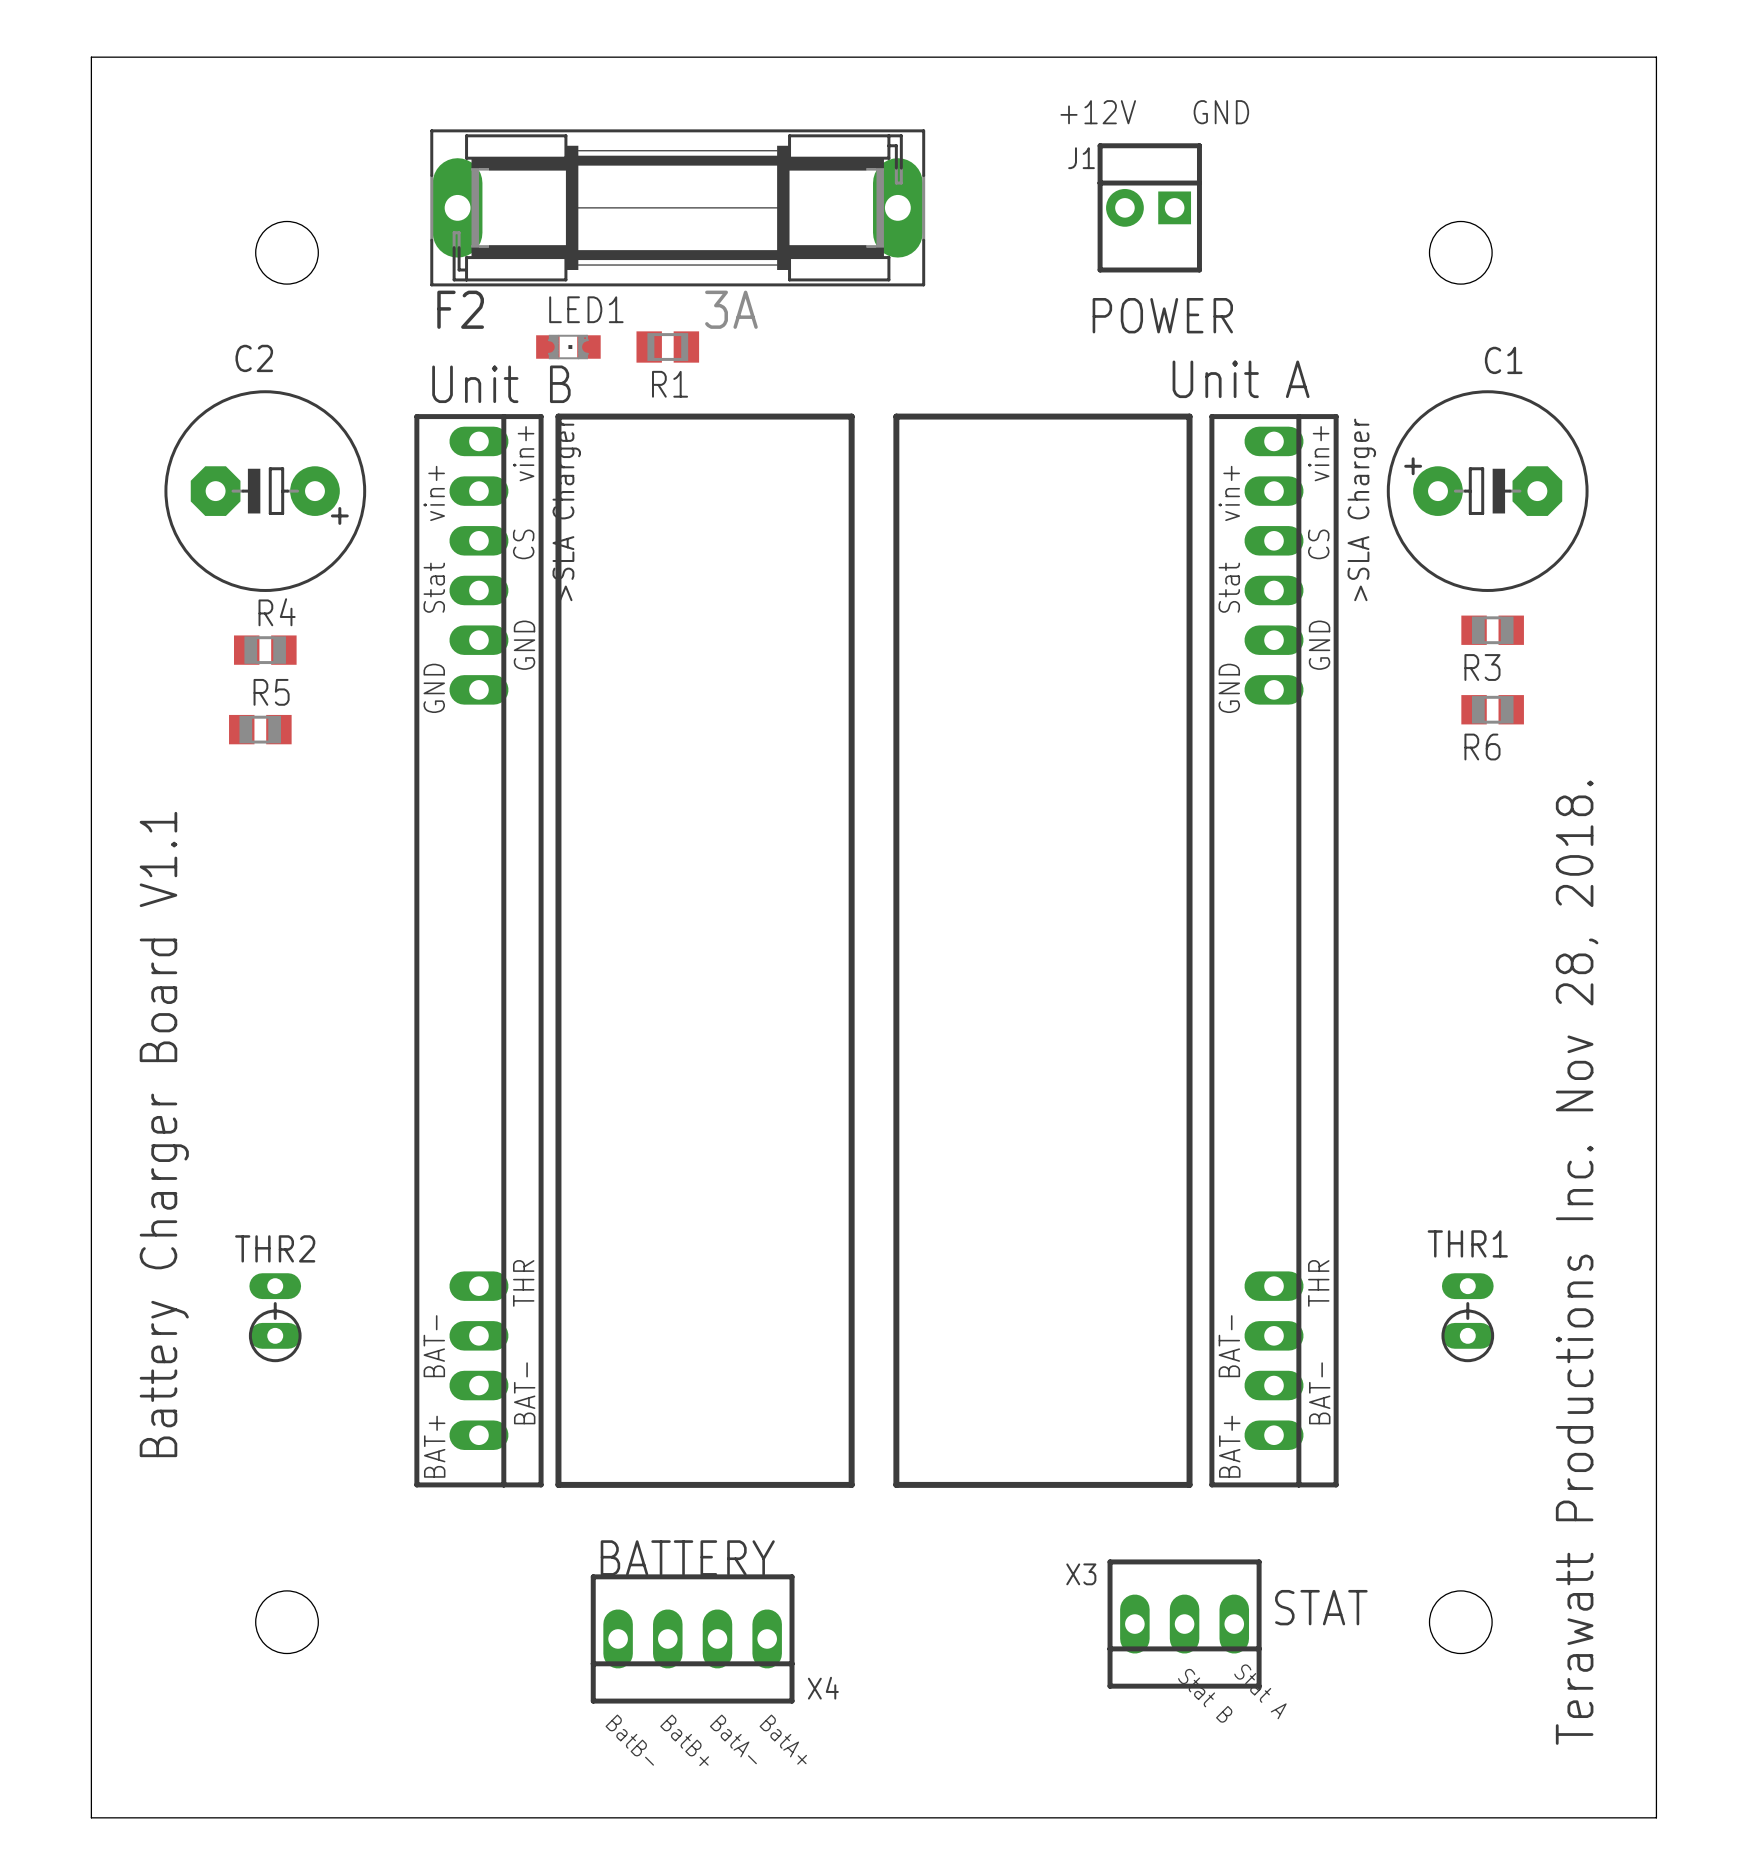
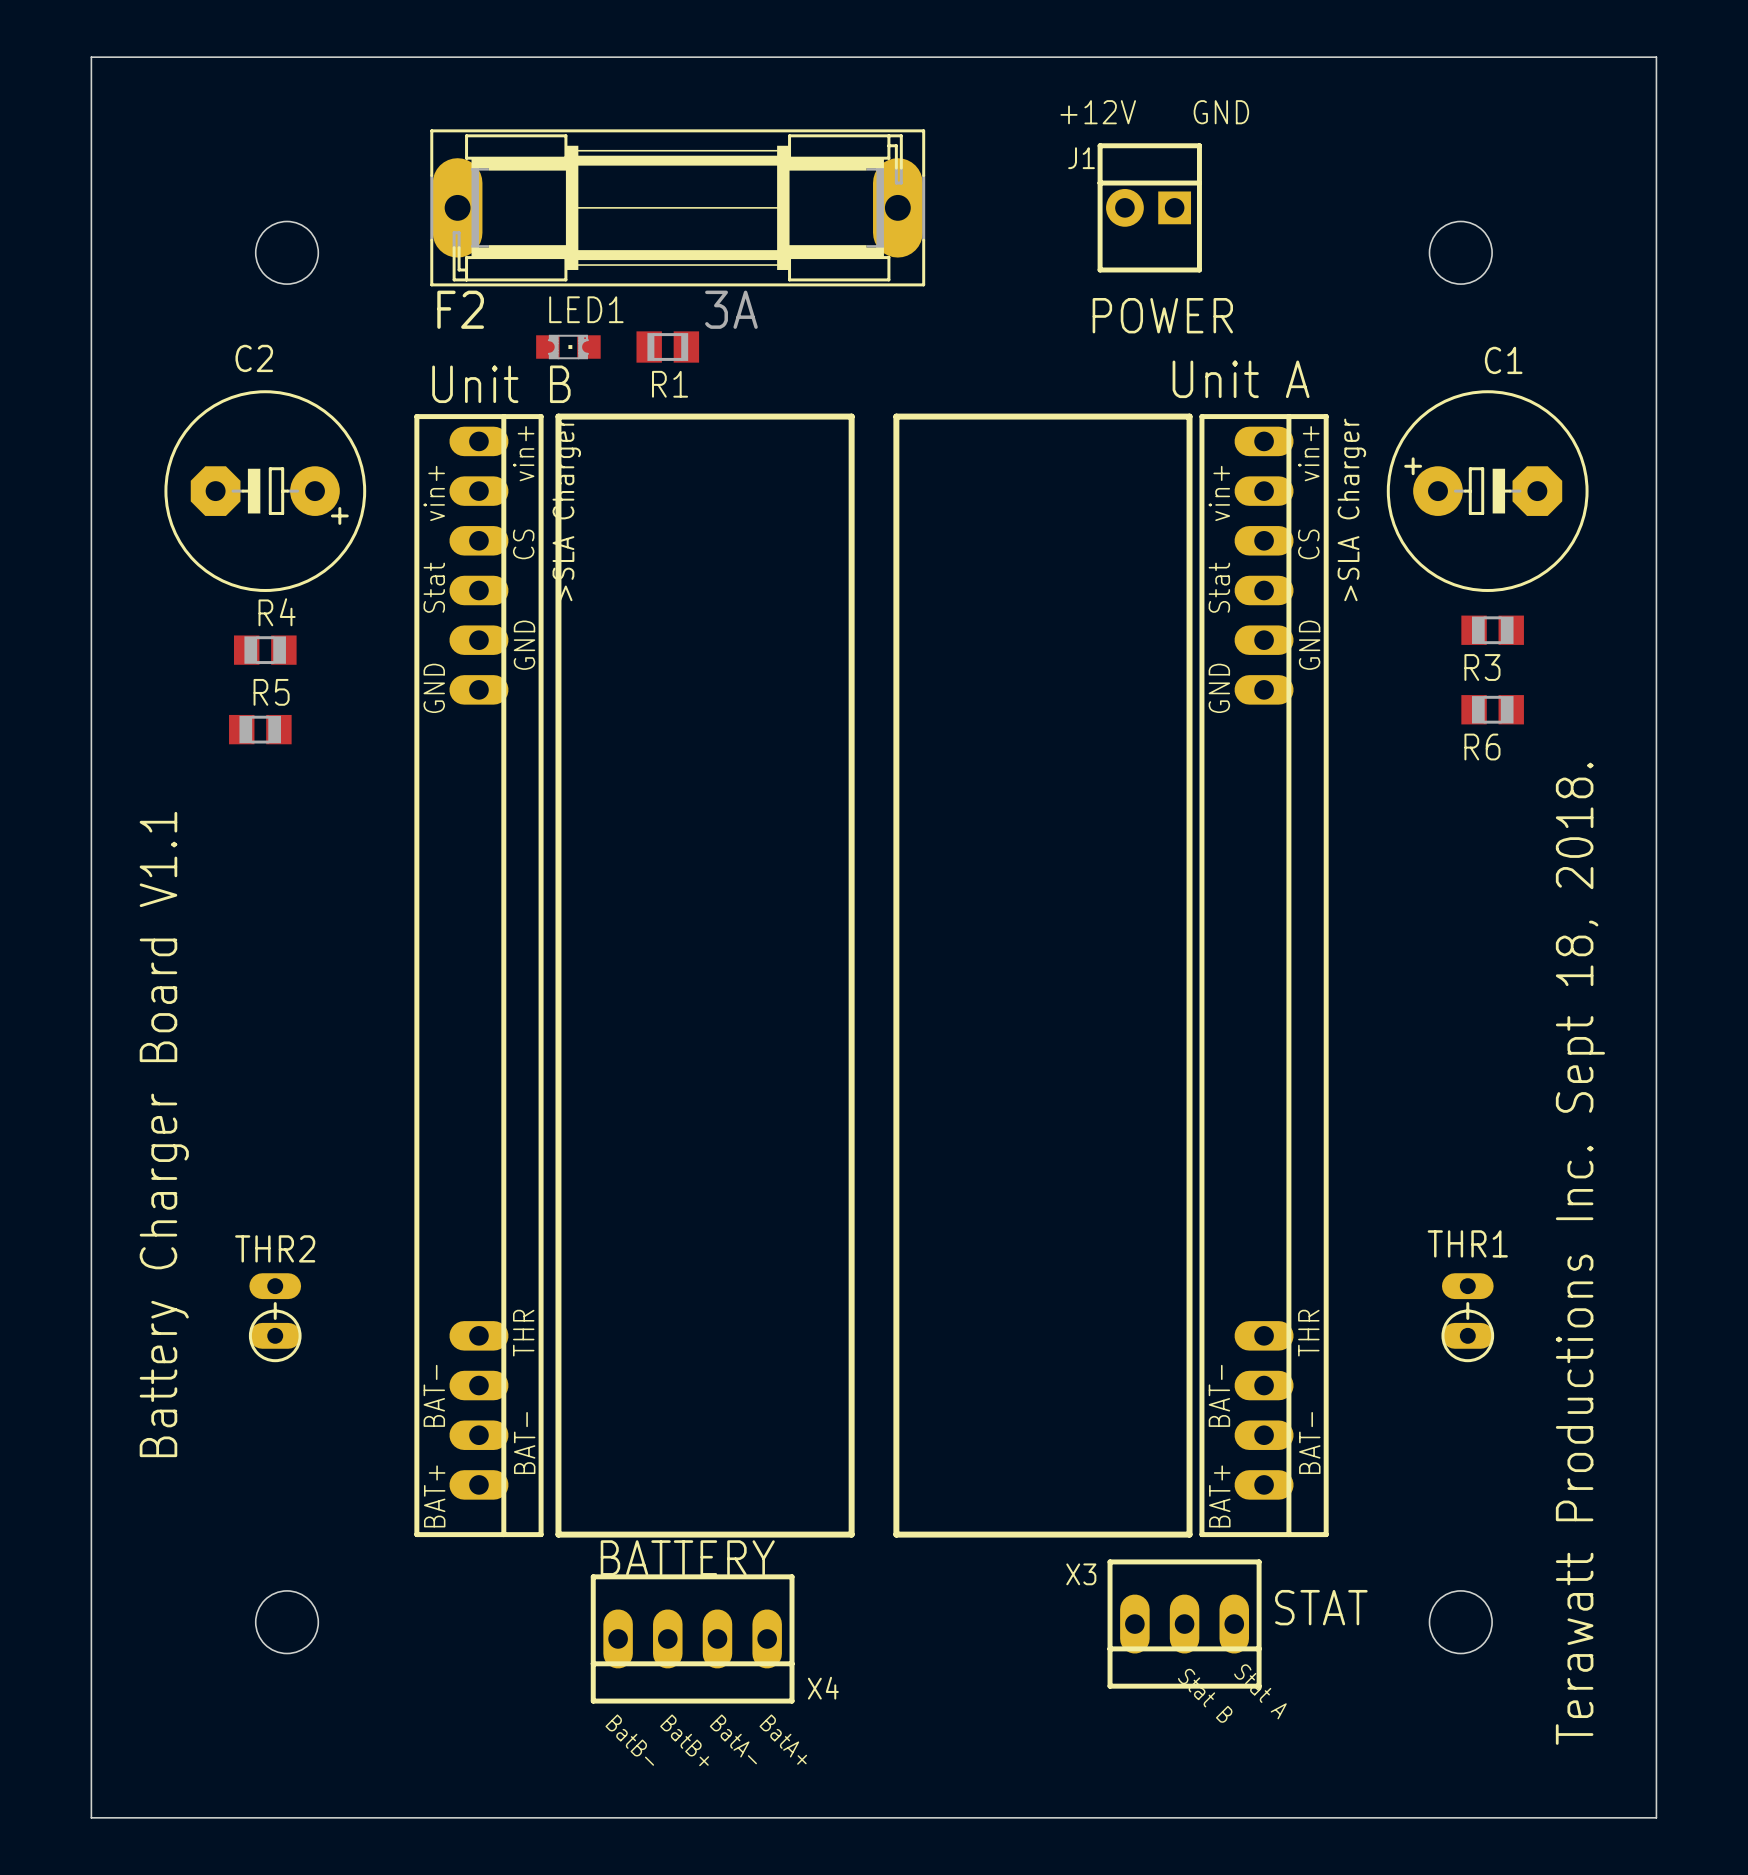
part: (478, 950) -> none
part: (1274, 950) -> none
part: none -> (478, 975)
part: none -> (1264, 975)
text: Terawatt Productions Inc. Nov 28, 2018. (1577, 1262) -> Terawatt Productions Inc. Sept 18, 2018. (1580, 1253)
line: (558, 1484) (851, 1484) -> (558, 1484) (558, 1534) (851, 1534) (851, 1484)
line: (896, 1484) (1189, 1484) -> (896, 1484) (896, 1534) (1189, 1534) (1189, 1484)

